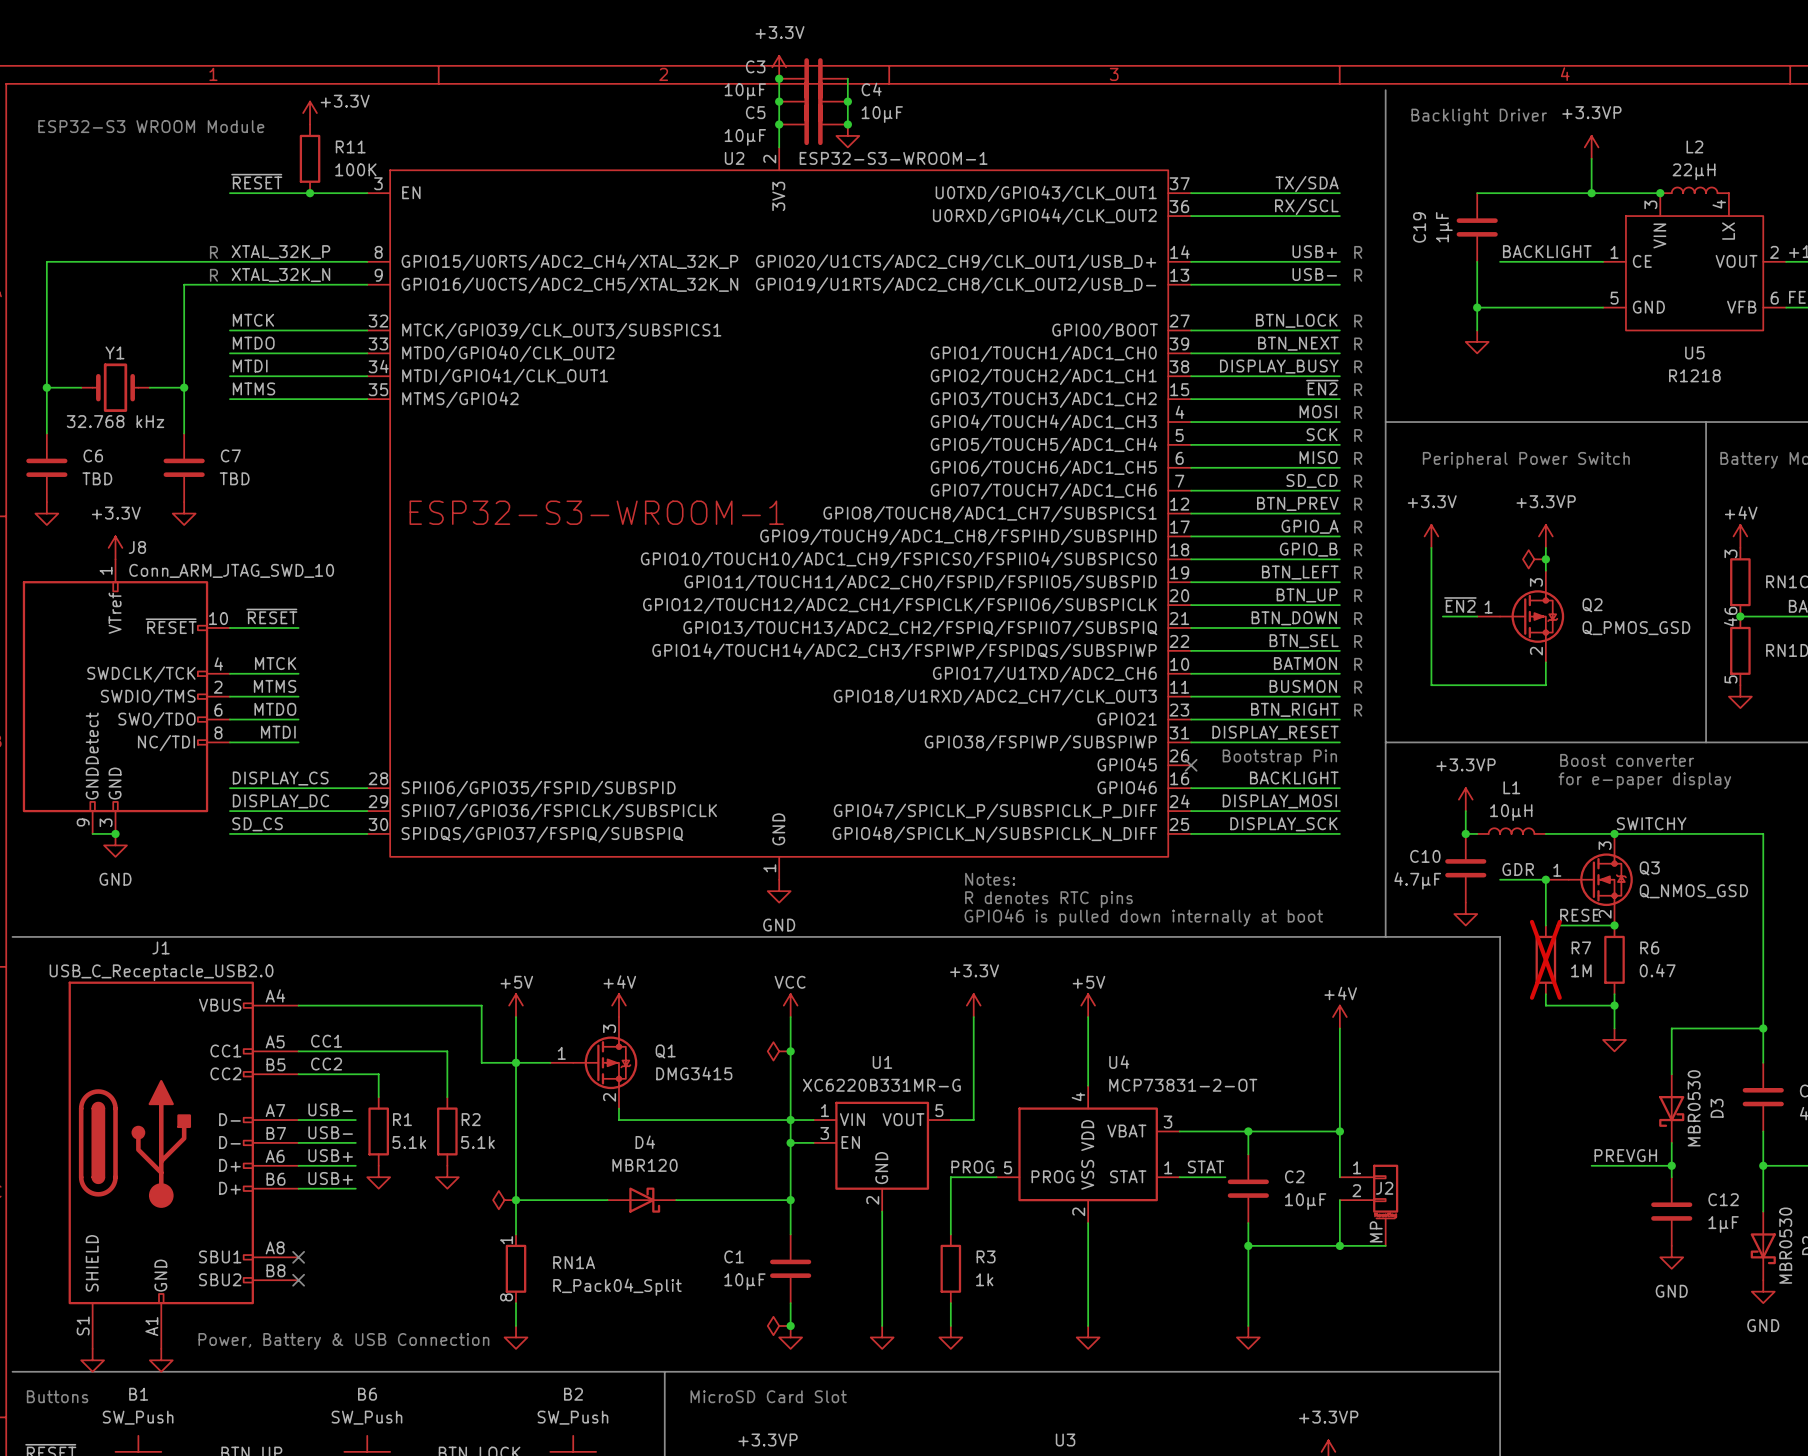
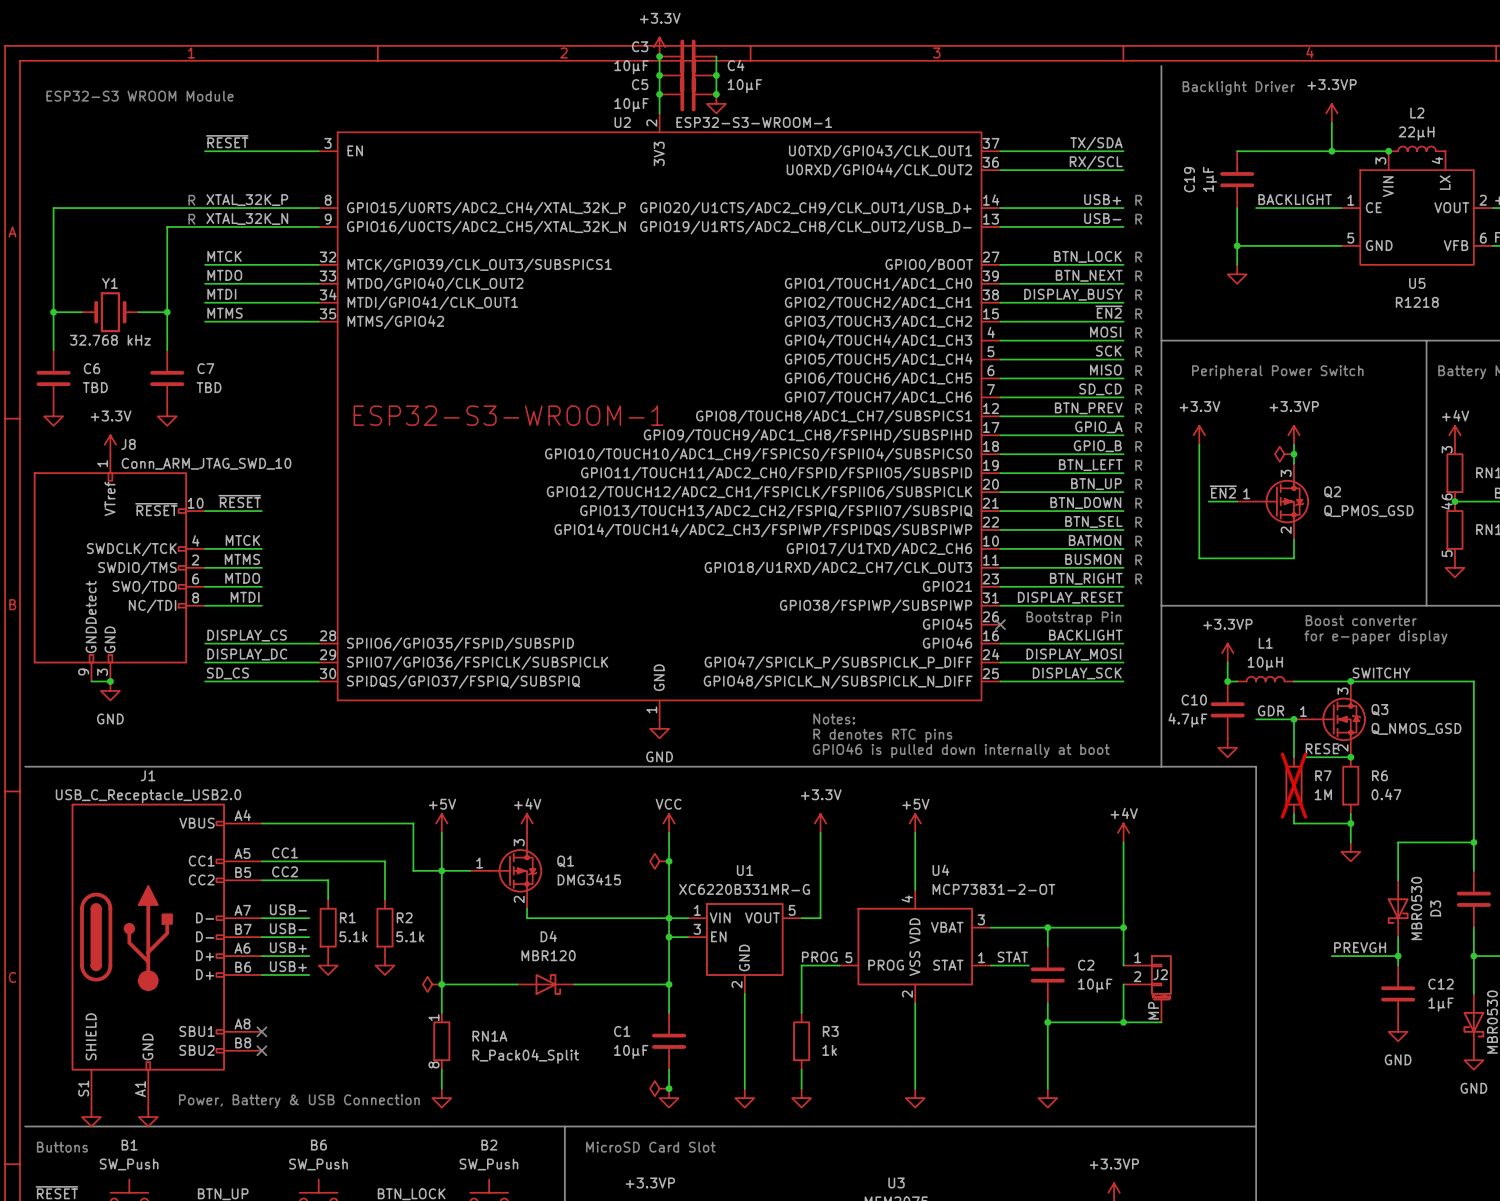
power symbol: +3.3V (310, 113) -> none
R11: 100K (310, 158) -> none
junction: (310, 193) -> none

